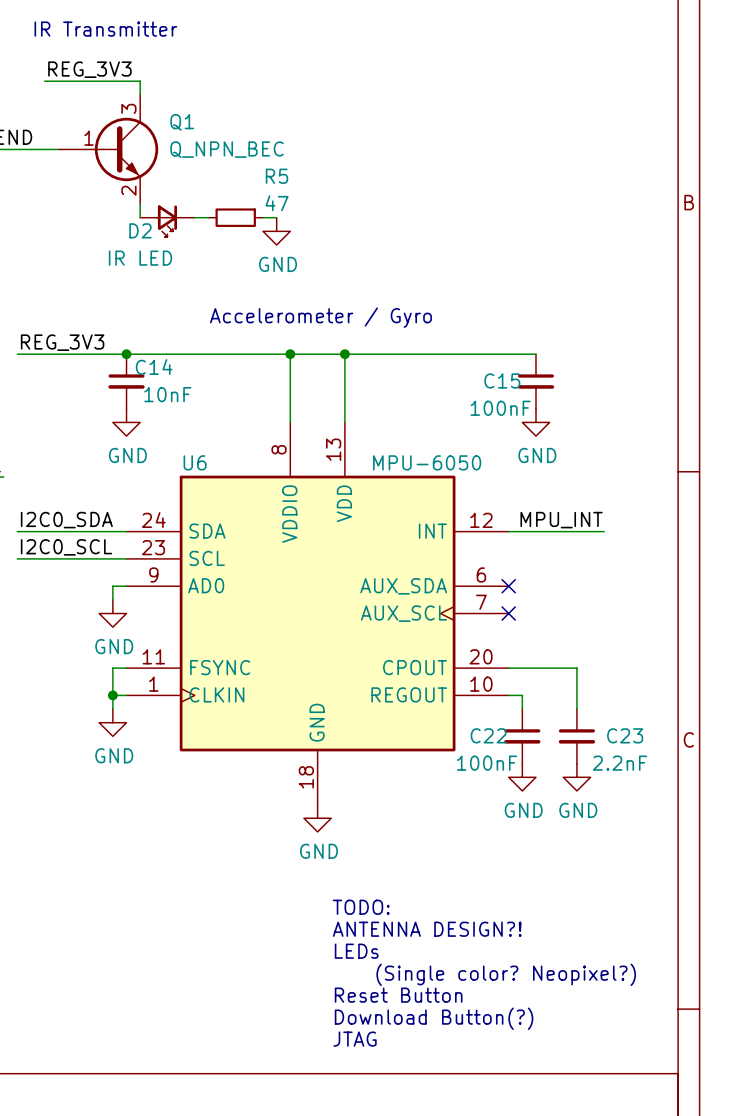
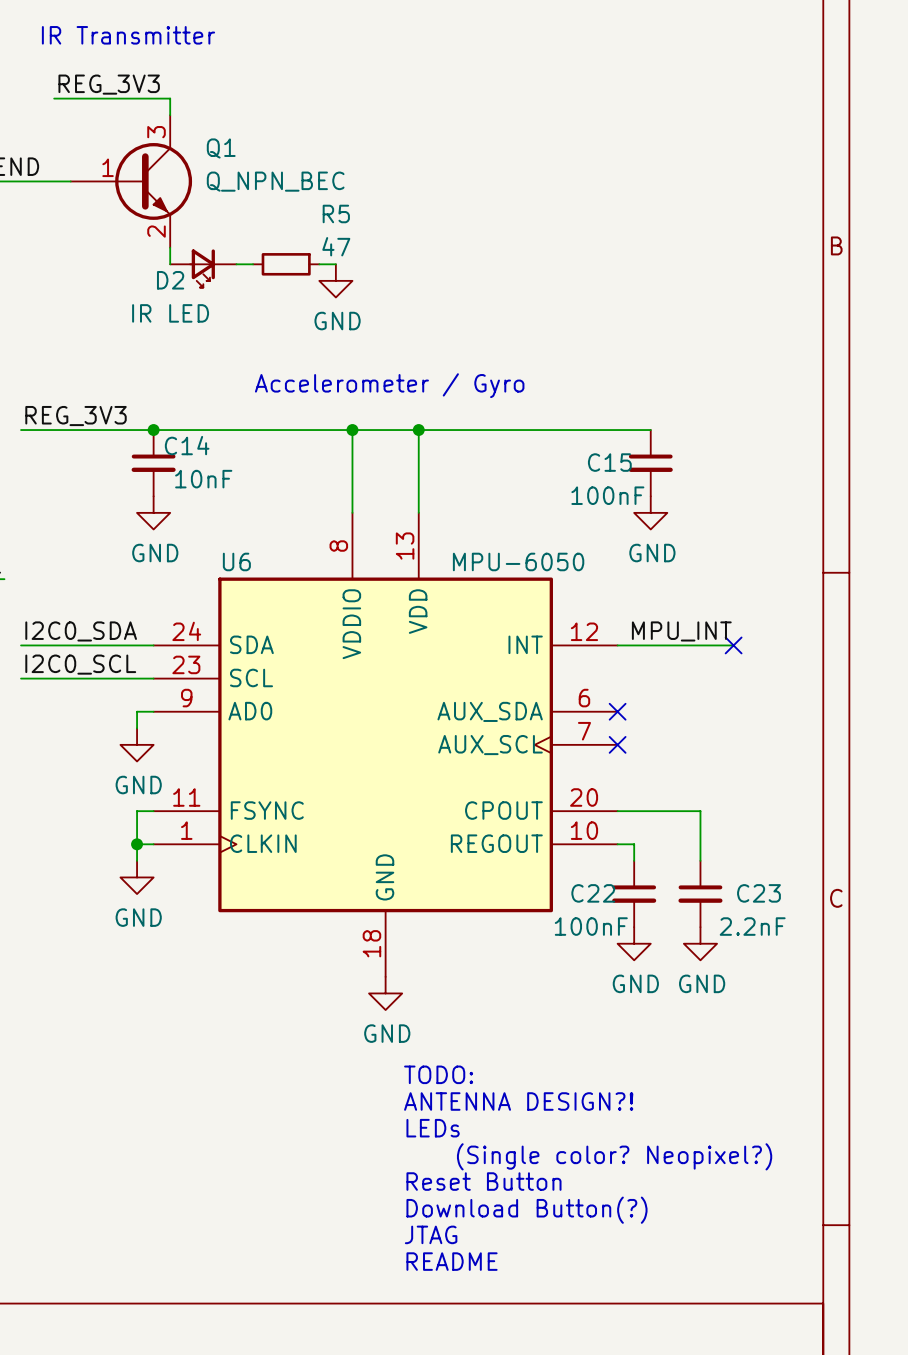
no-connect mark: none -> (733, 645)
text: none -> TODO: (438, 1074)
text: TODO: (361, 907) -> ANTENNA DESIGN?! (518, 1101)
text: ANTENNA DESIGN?! (427, 929) -> LEDs (433, 1128)
text: LEDs (356, 951) -> (Single color? Neopixel?) (614, 1156)
text: (Single color? Neopixel?) (506, 974) -> Reset Button (483, 1181)
text: Reset Button (398, 995) -> Download Button(?) (526, 1210)
text: Download Button(?) (434, 1018) -> JTAG (431, 1234)
text: JTAG (355, 1039) -> README (452, 1261)

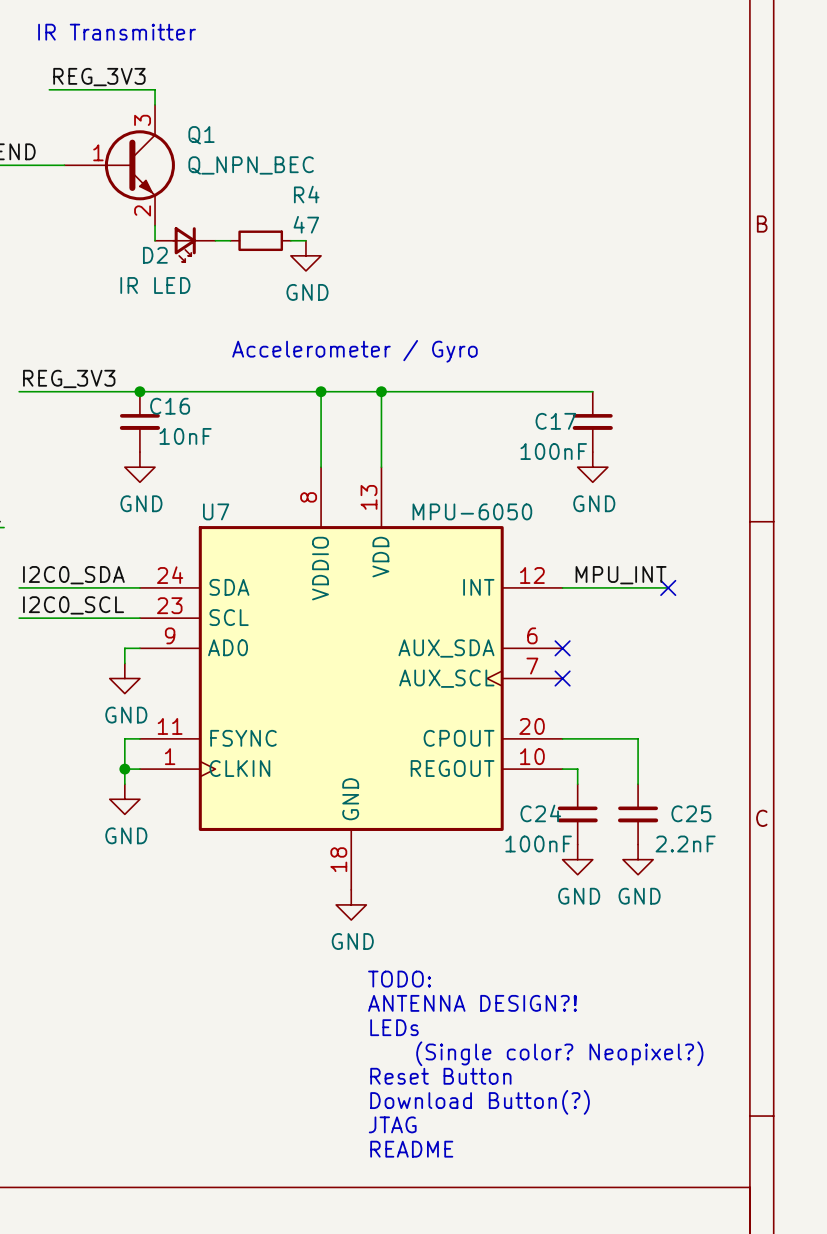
R5 name: R5 (336, 213) -> R4 (306, 194)
C14 name: C14 (187, 445) -> C16 (170, 406)
C15 name: C15 (609, 462) -> C17 (555, 421)
U6 name: U6 (236, 561) -> U7 (216, 511)
C22 name: C22 (593, 893) -> C24 (540, 813)
C23 name: C23 (758, 893) -> C25 (691, 813)

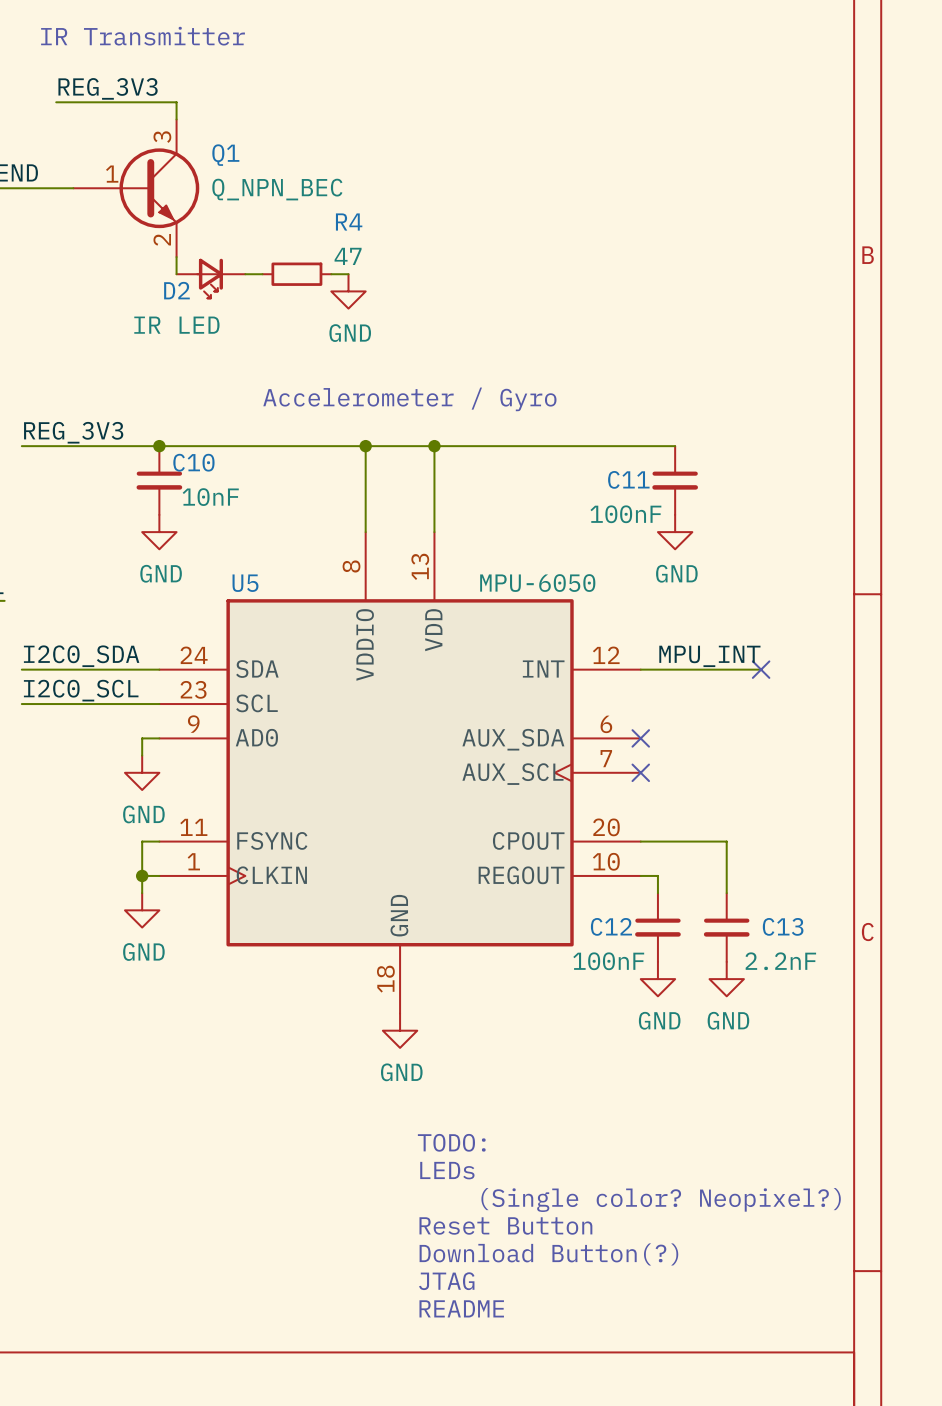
C16 name: C16 (170, 406) -> C10 (193, 462)
C17 name: C17 (555, 421) -> C11 (628, 479)
U7 name: U7 (216, 511) -> U5 (245, 583)
C24 name: C24 (540, 813) -> C12 (611, 926)
C25 name: C25 (691, 813) -> C13 (783, 926)
text: TODO: (399, 979) -> none
text: ANTENNA DESIGN?! (472, 1003) -> TODO: (451, 1142)

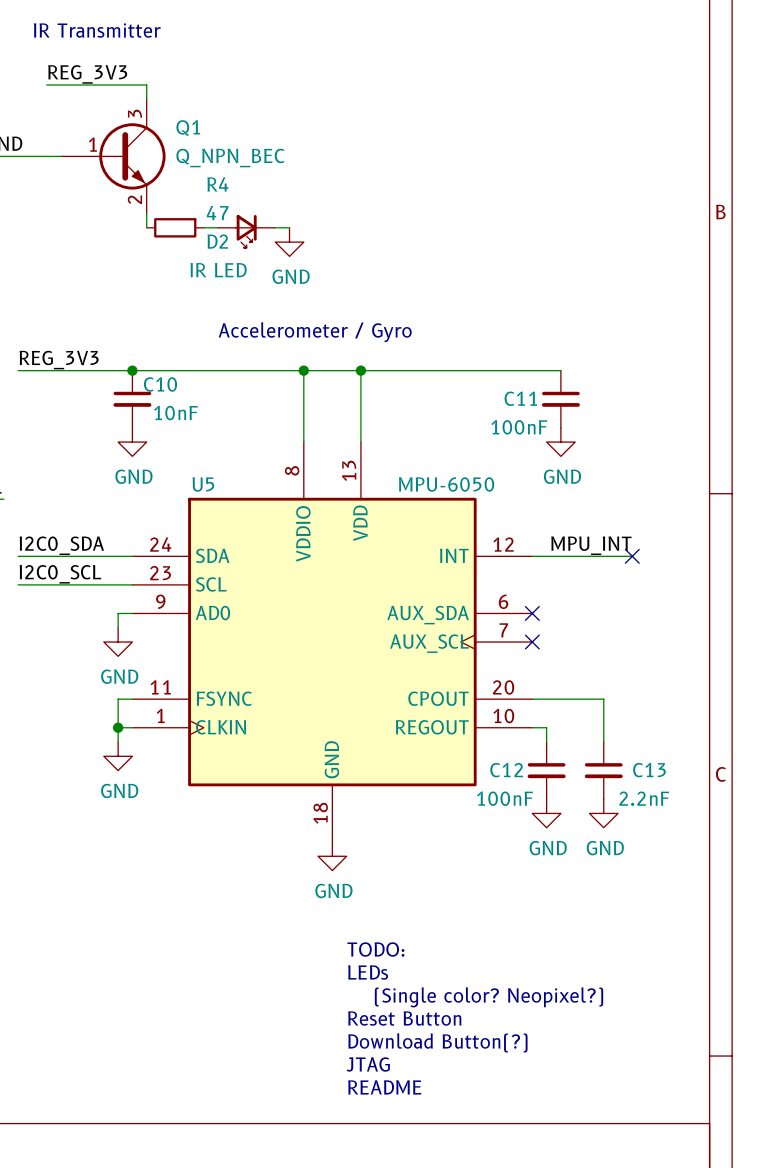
R4 position: (296, 274) -> (175, 227)
D2 position: (210, 278) -> (246, 231)

